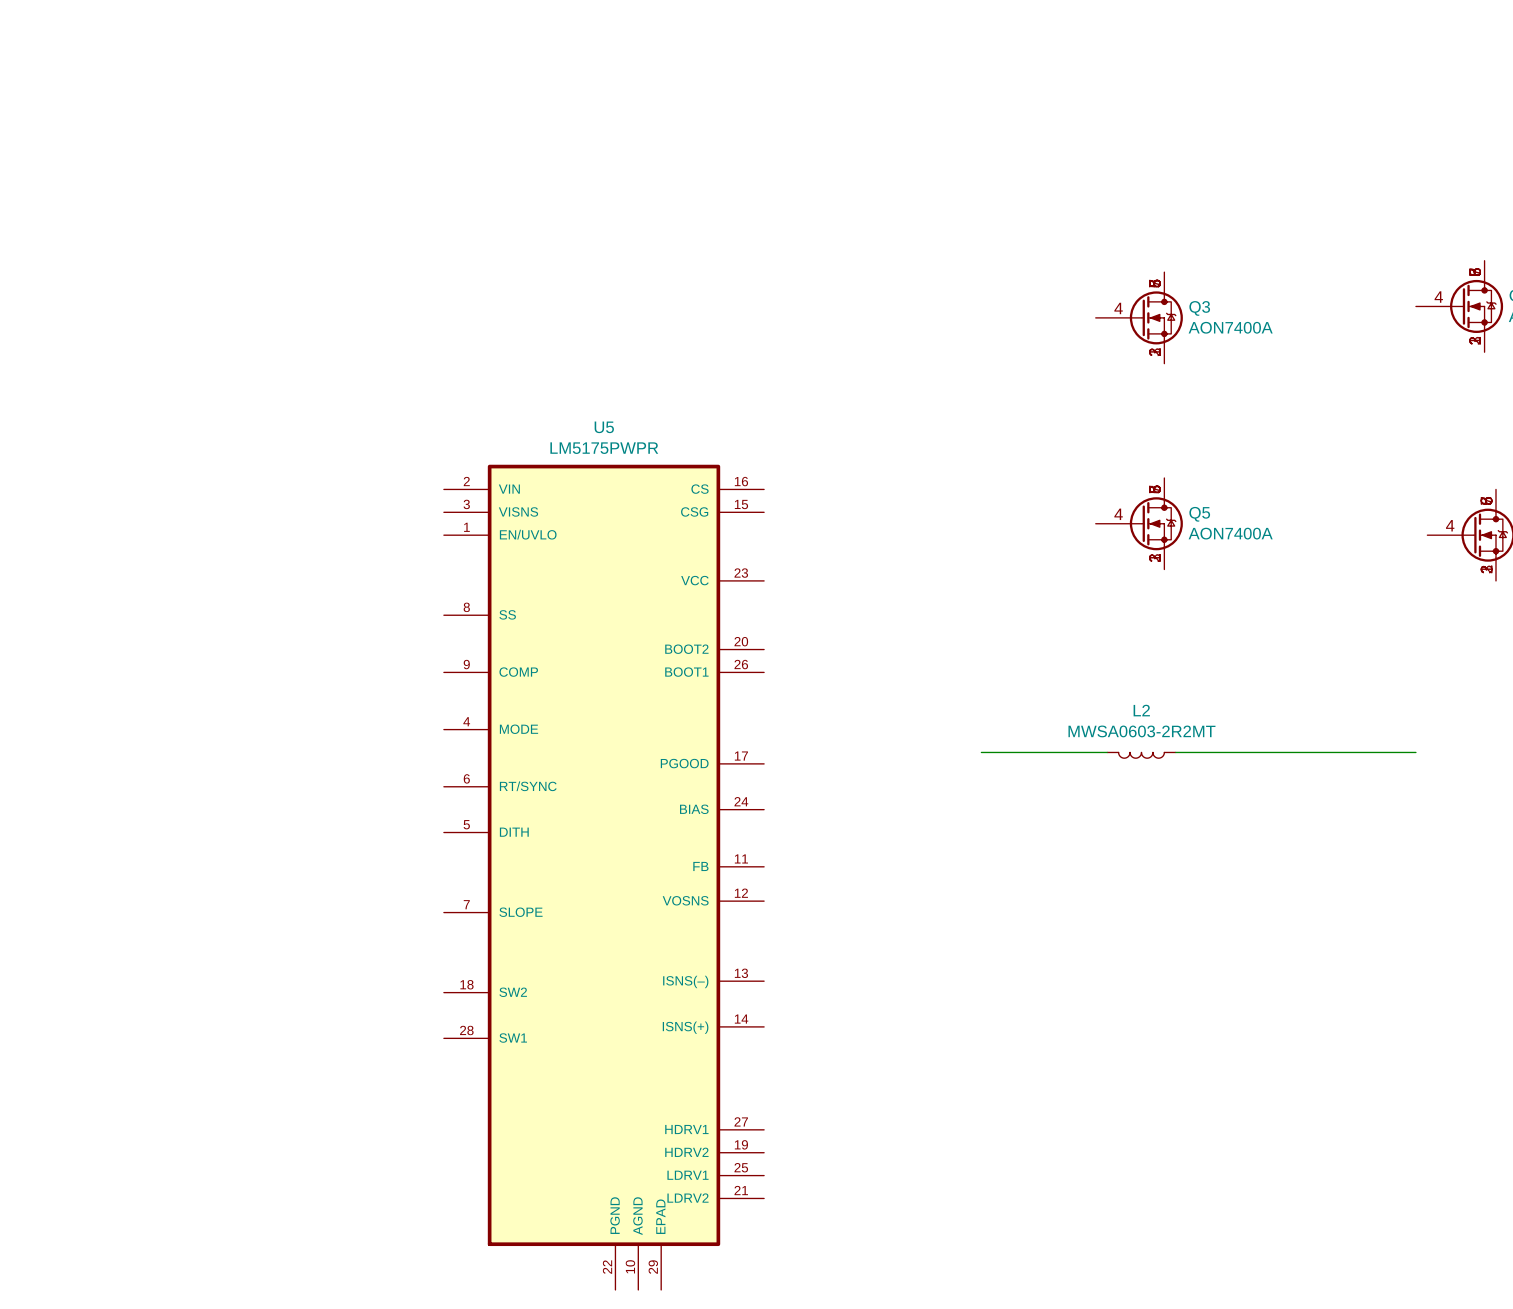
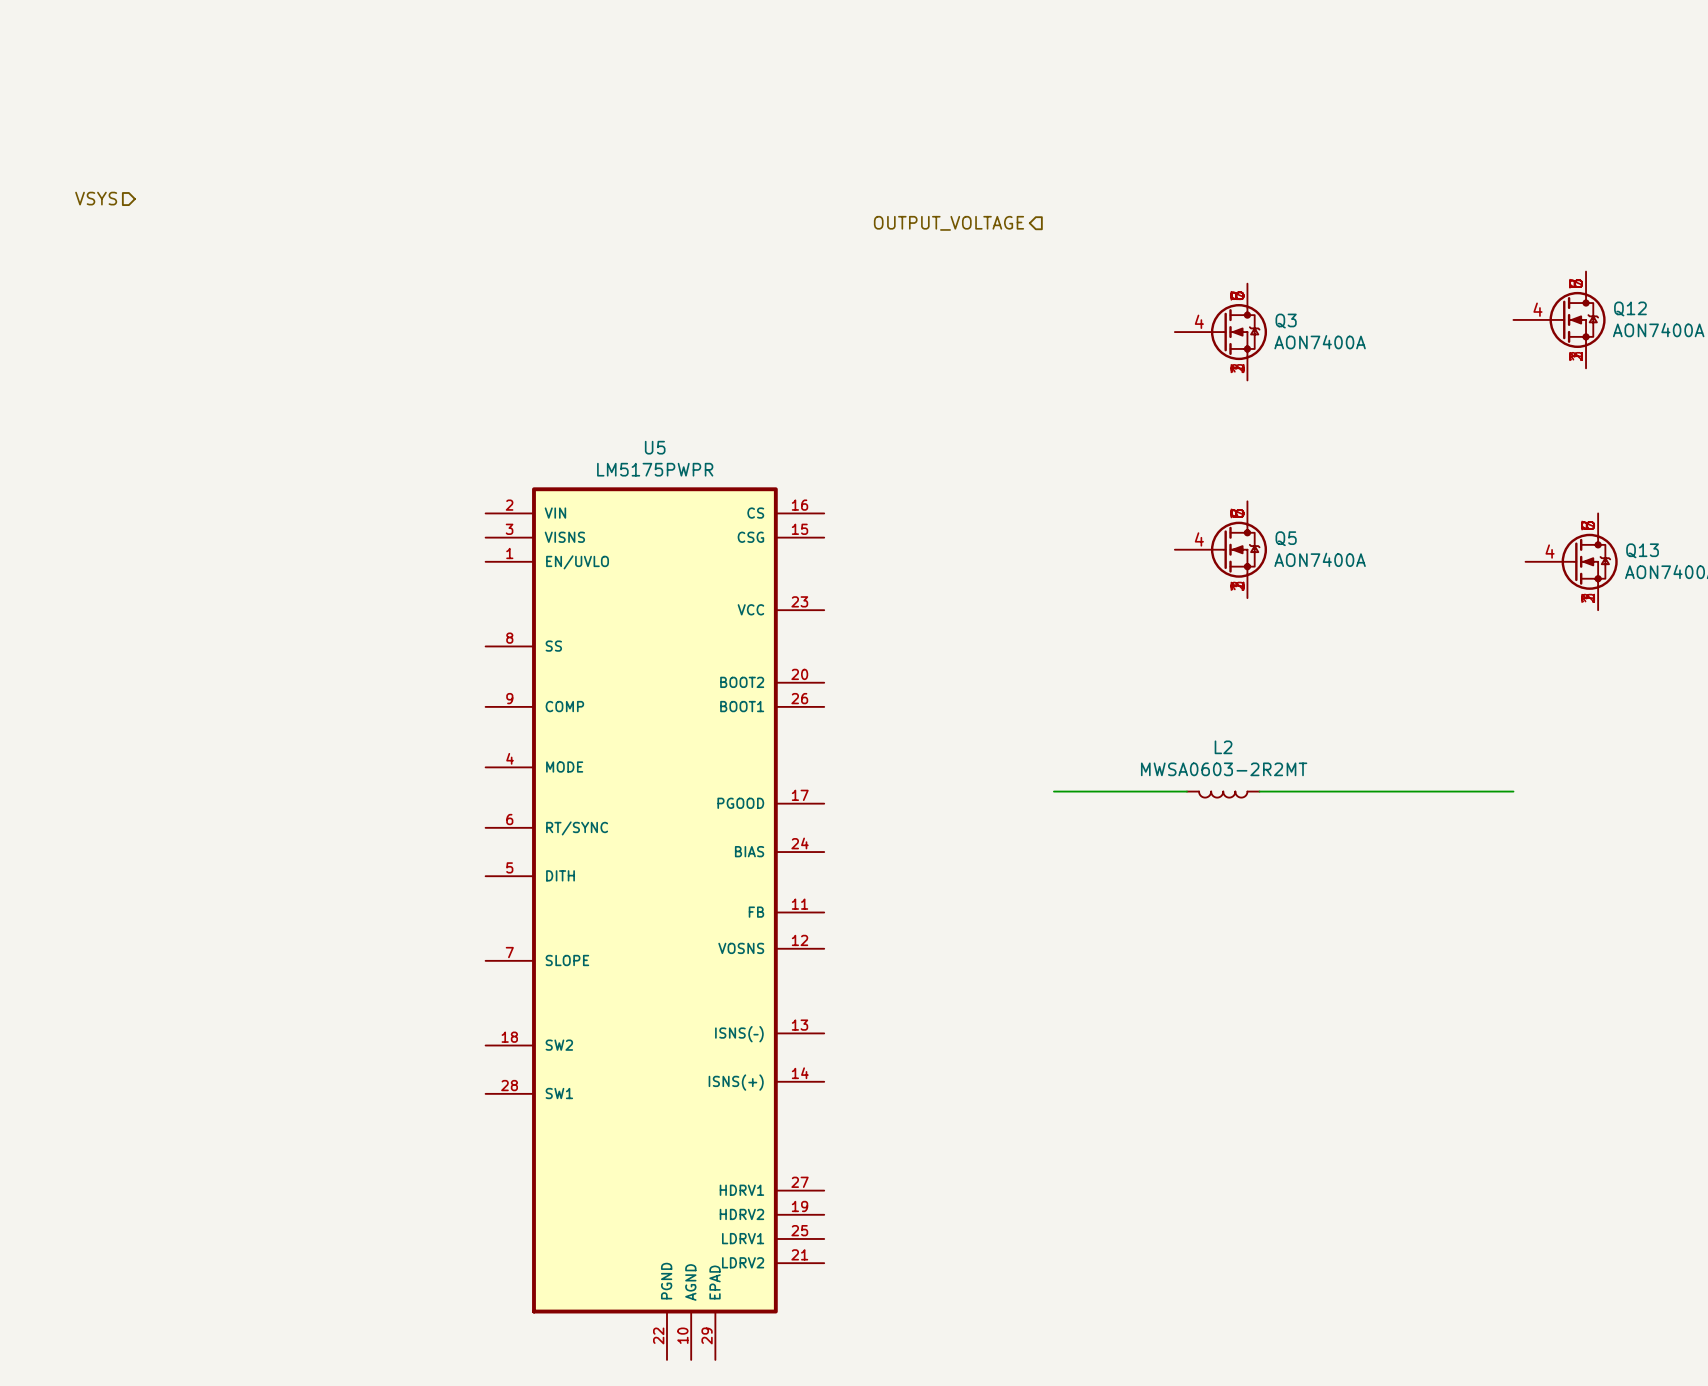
hierarchical label: none -> VSYS (96, 198)
hierarchical label: none -> OUTPUT_VOLTAGE (948, 223)

